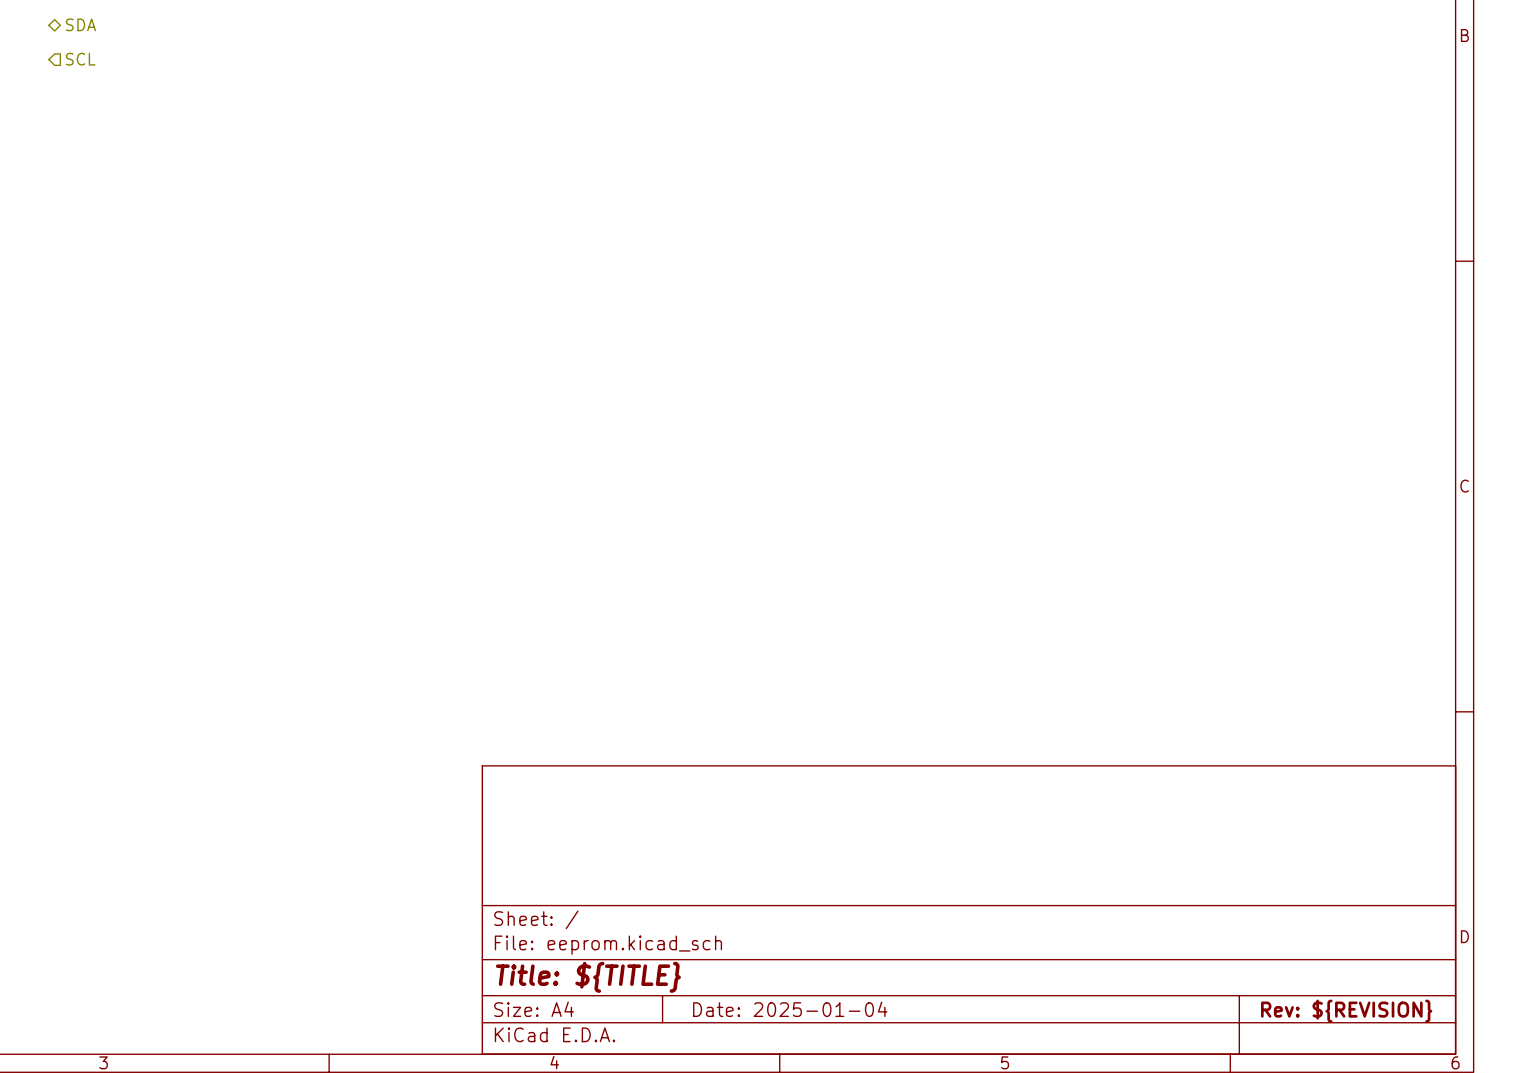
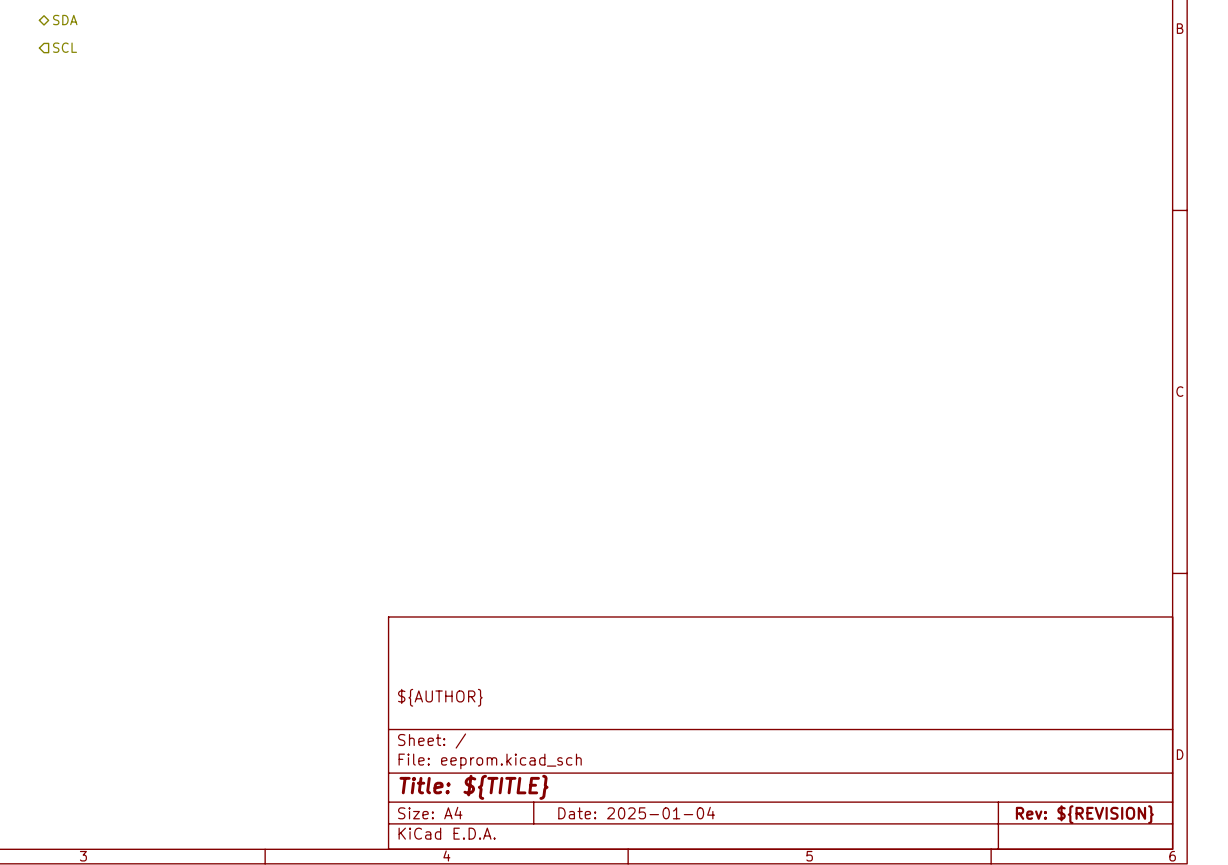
title block: none -> ${AUTHOR} (440, 697)

